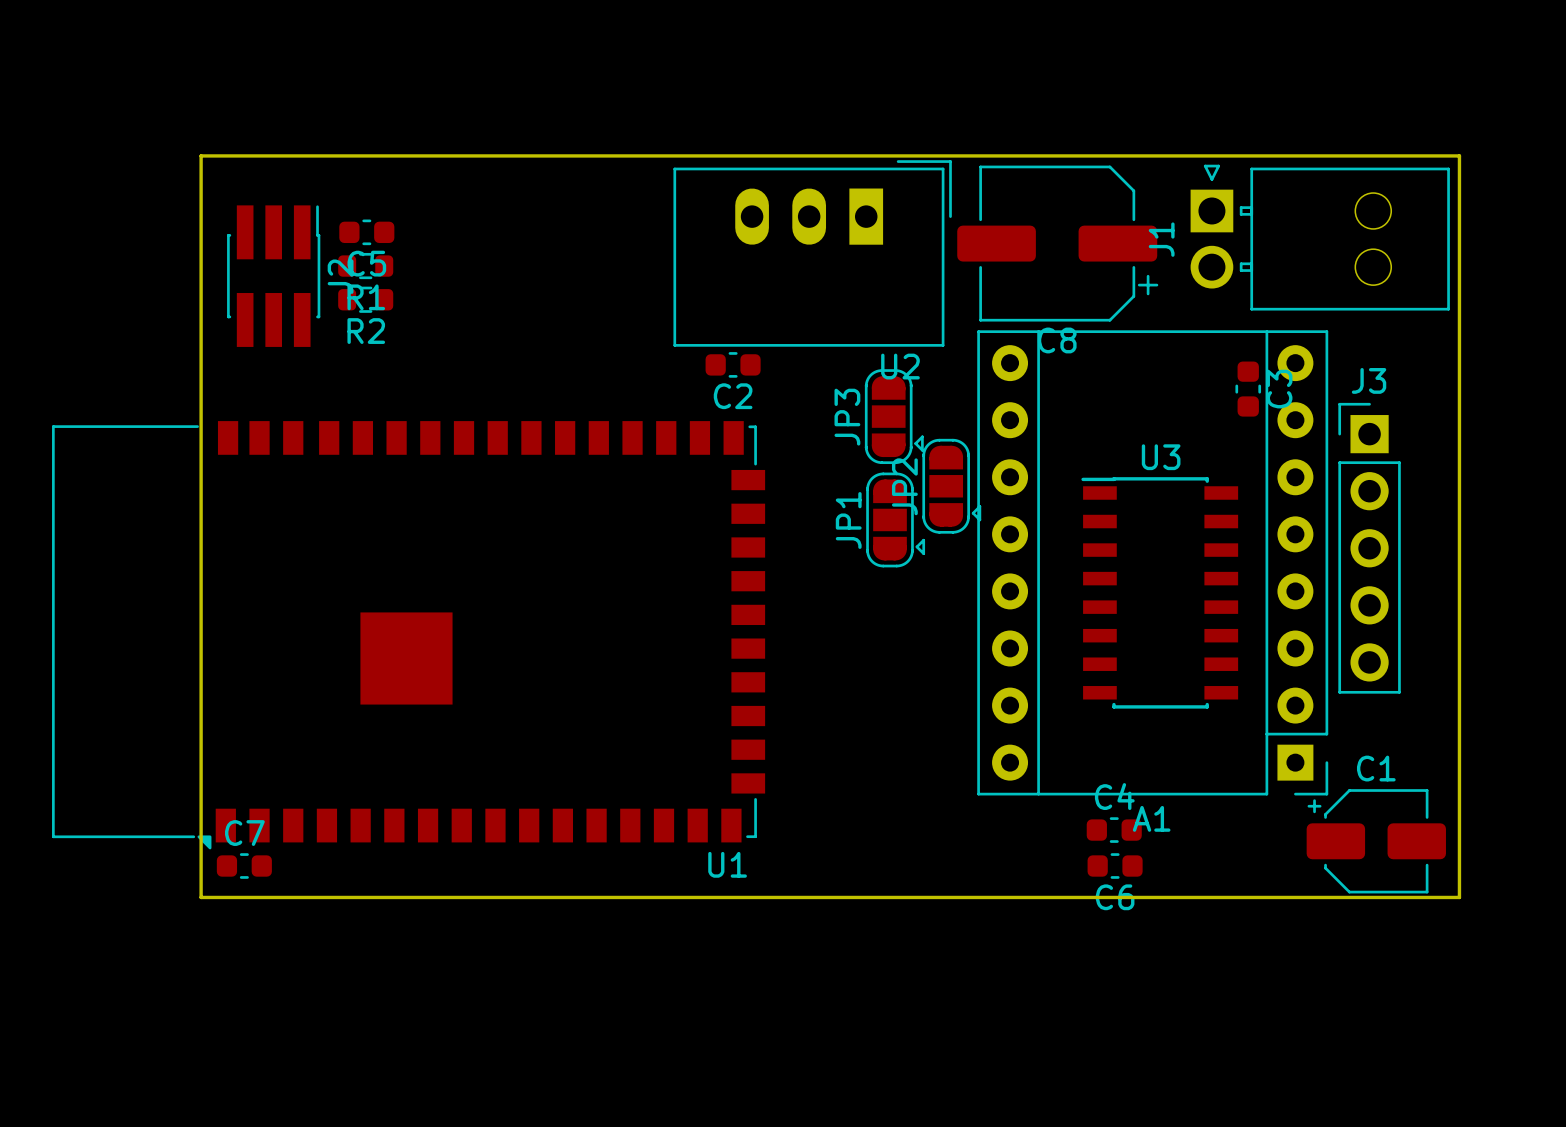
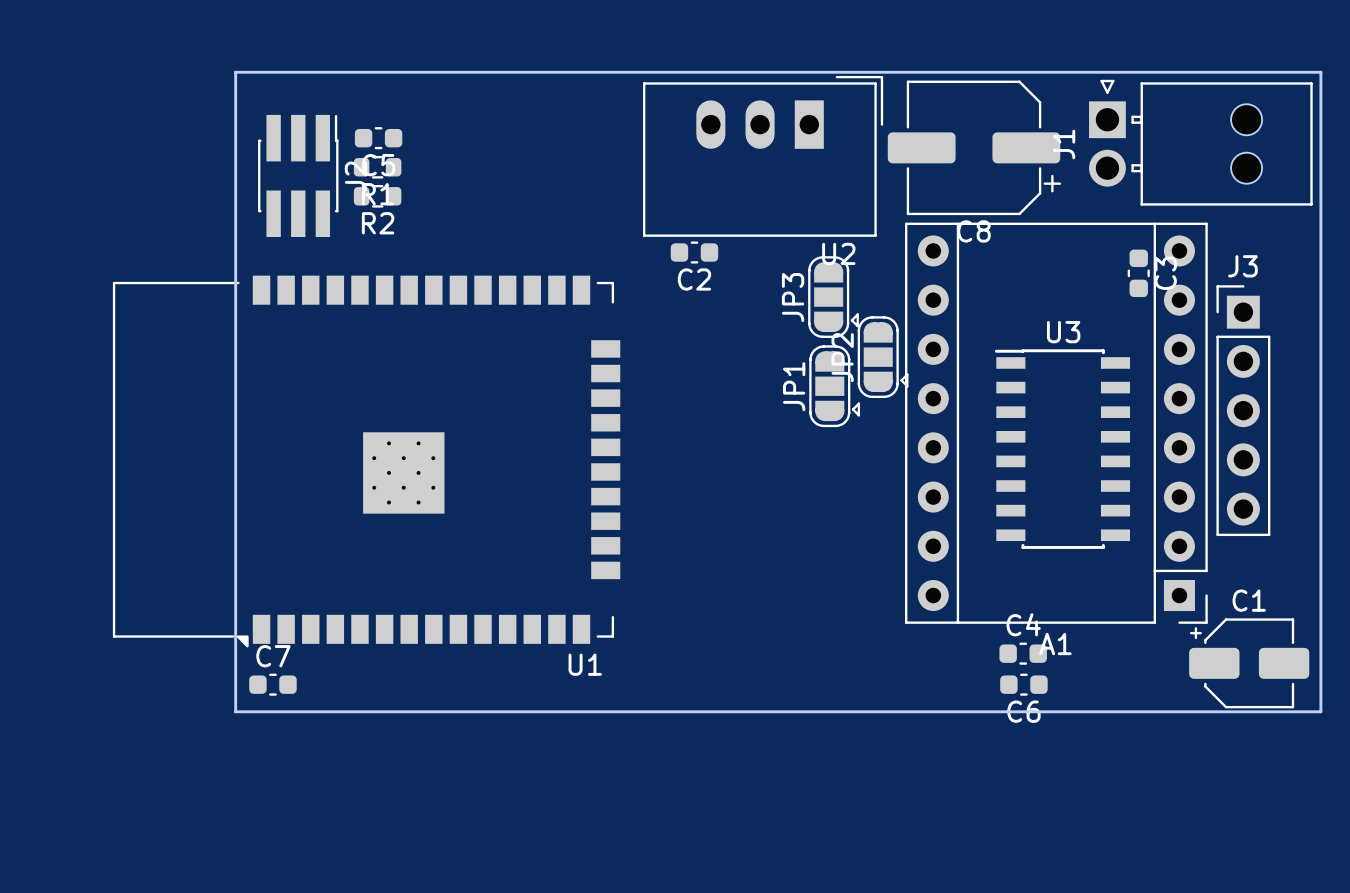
U1 footprint: [52, 421, 766, 850] -> [112, 275, 621, 648]
U1 name position: U1 (727, 864) -> U1 (585, 664)

